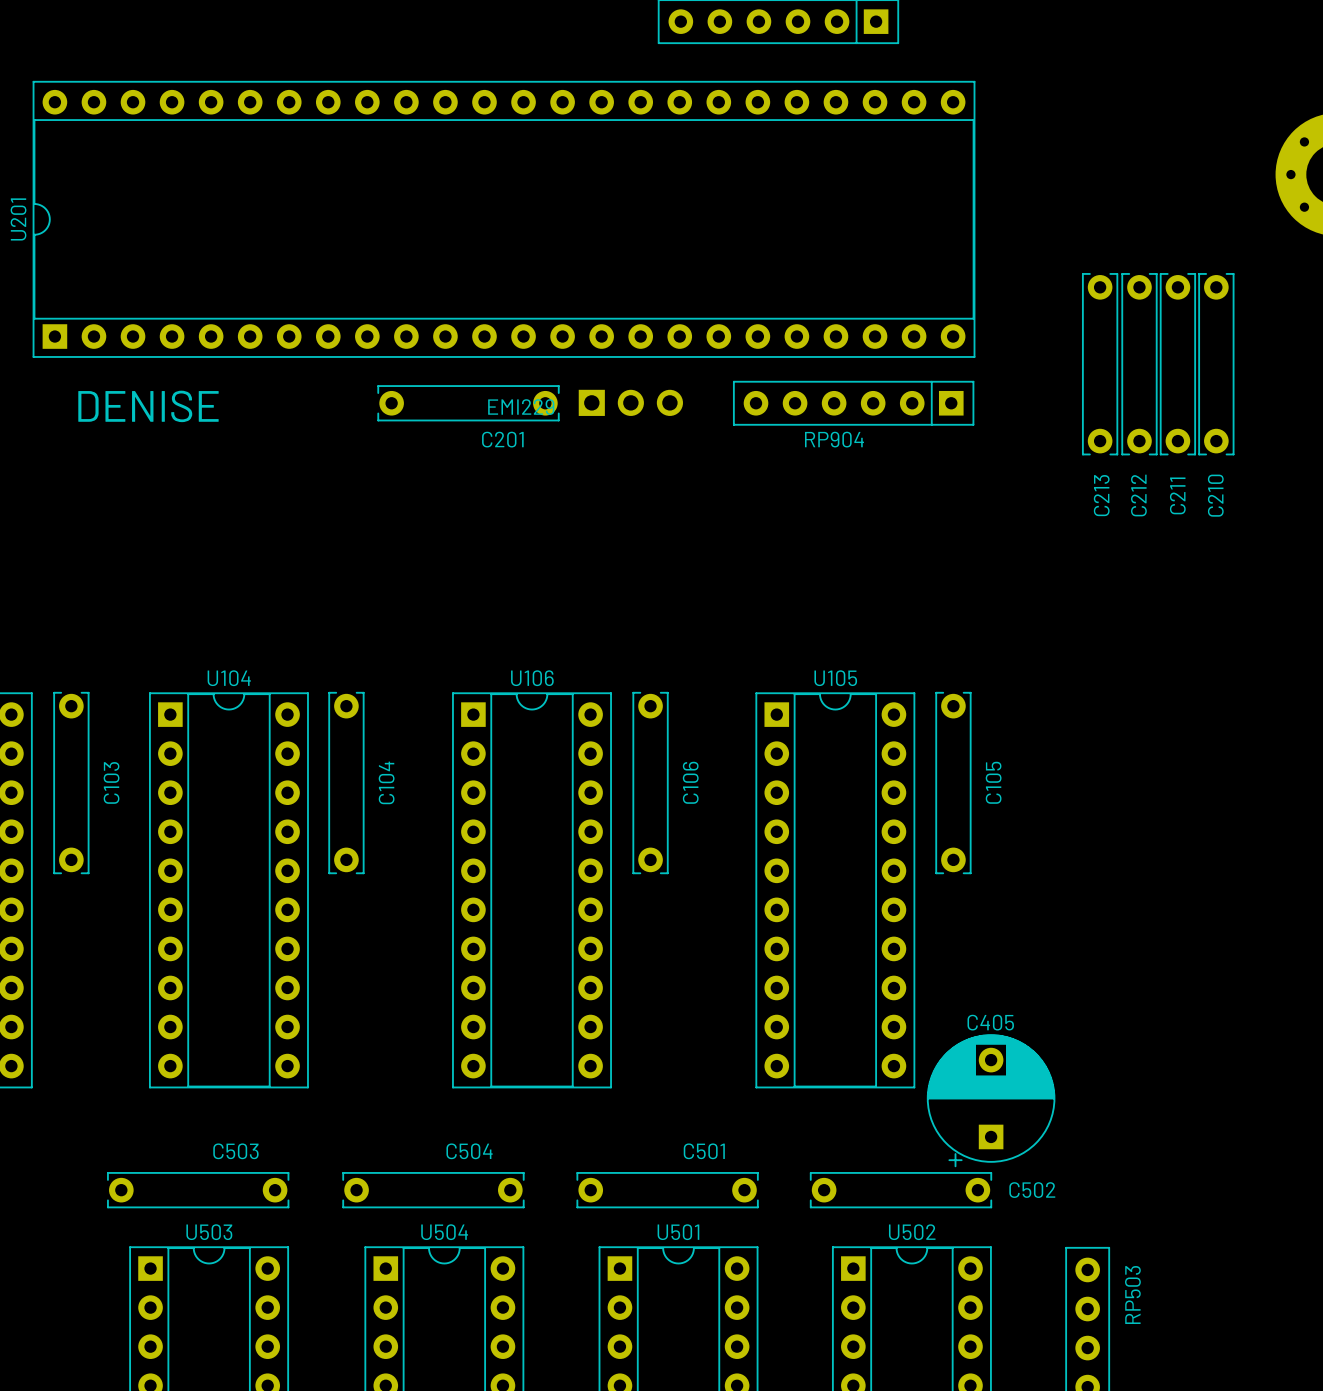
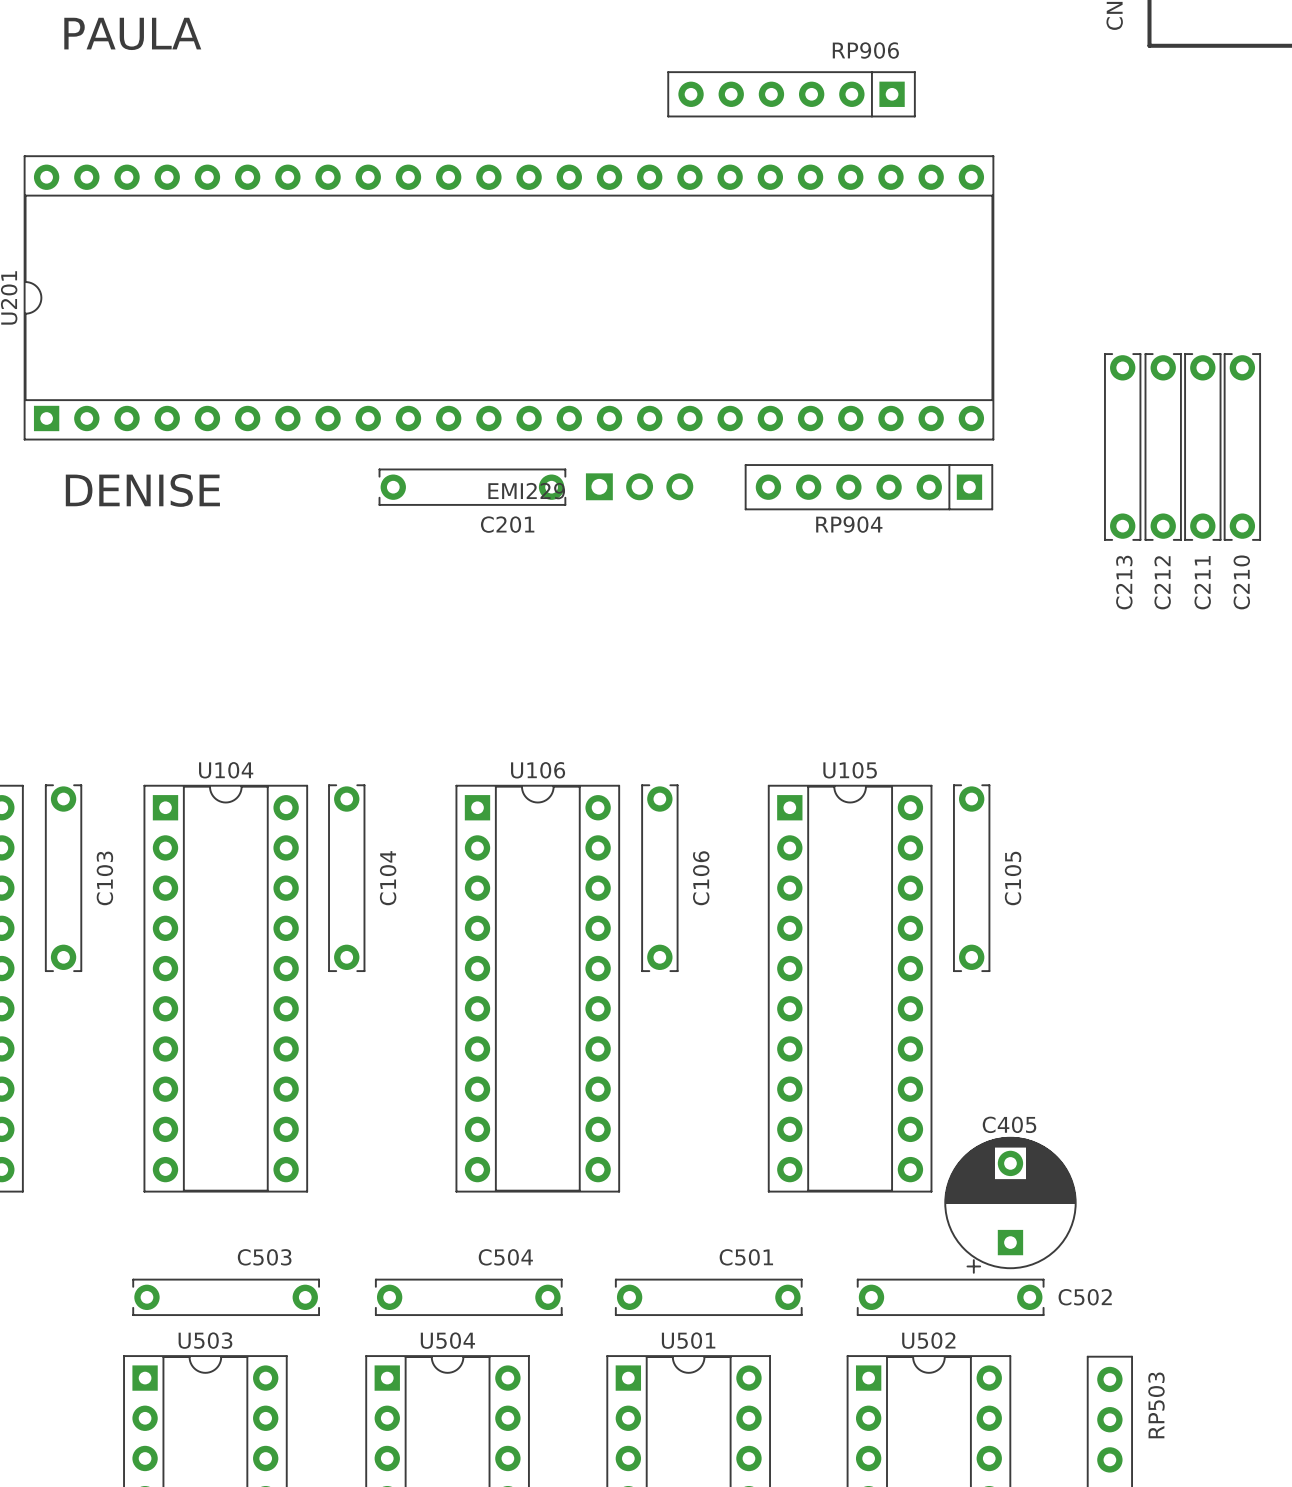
C503 position: (198, 1190) -> (226, 1297)
C504 position: (433, 1190) -> (468, 1297)
C501 position: (667, 1190) -> (708, 1297)
C502 position: (901, 1190) -> (950, 1297)

